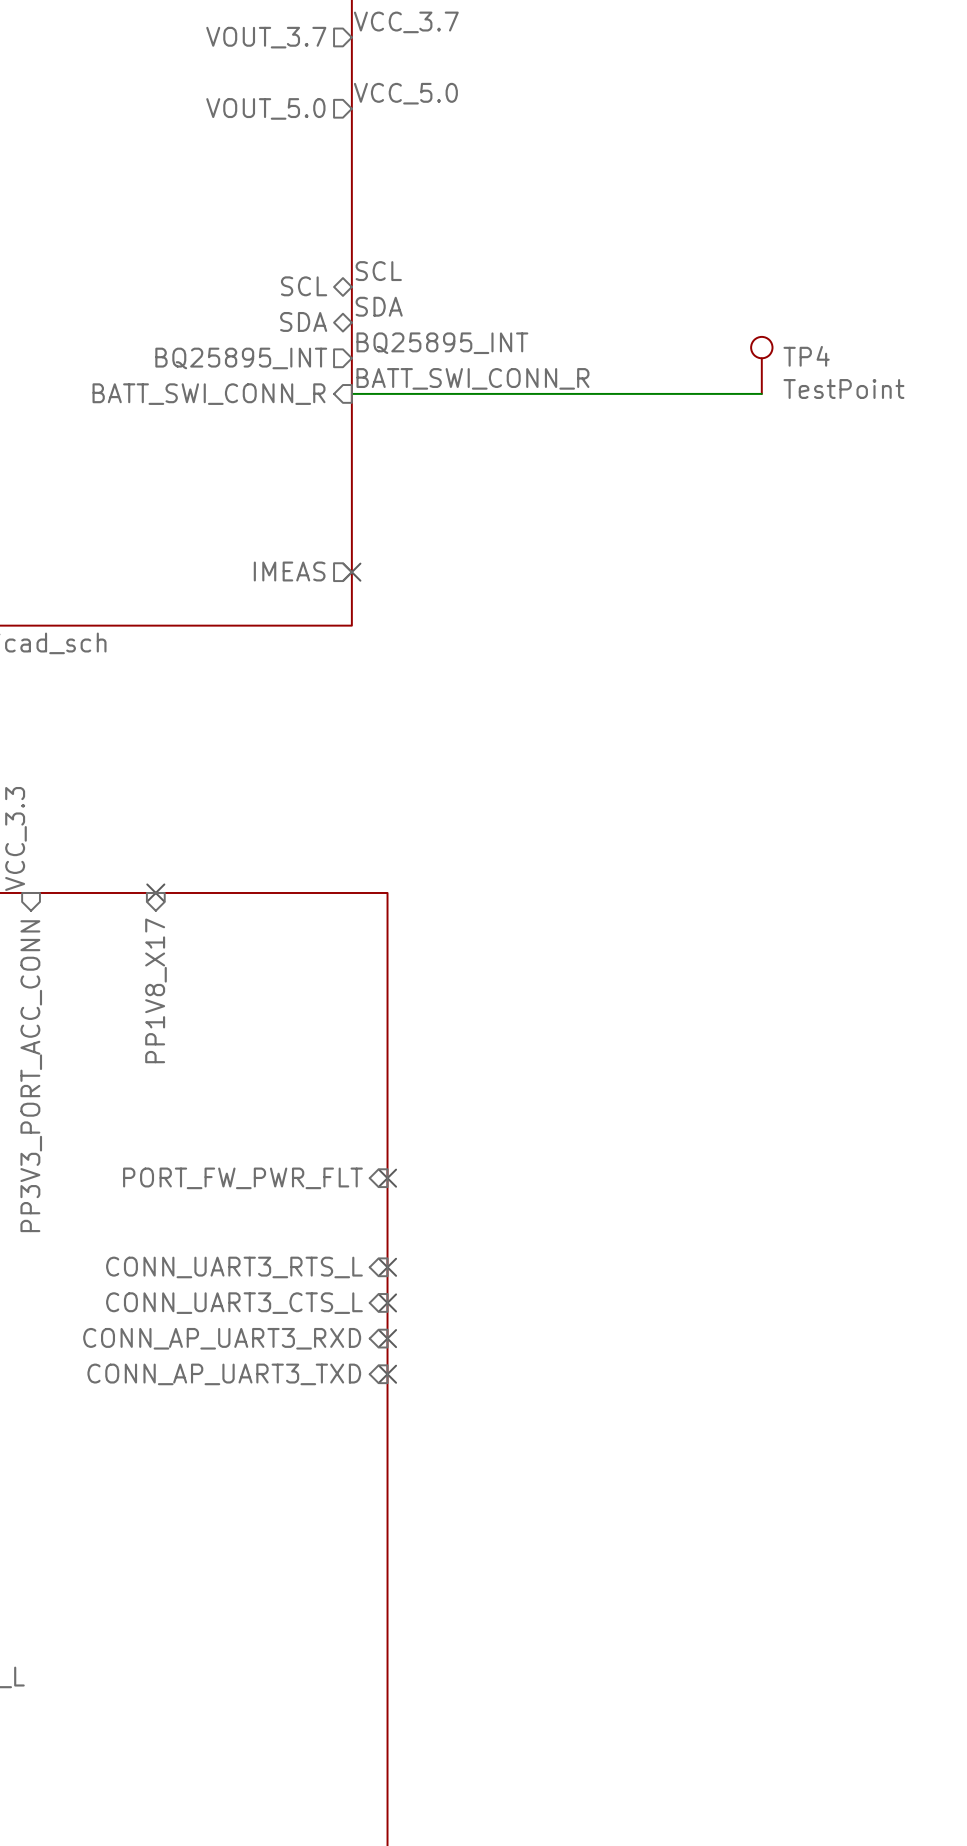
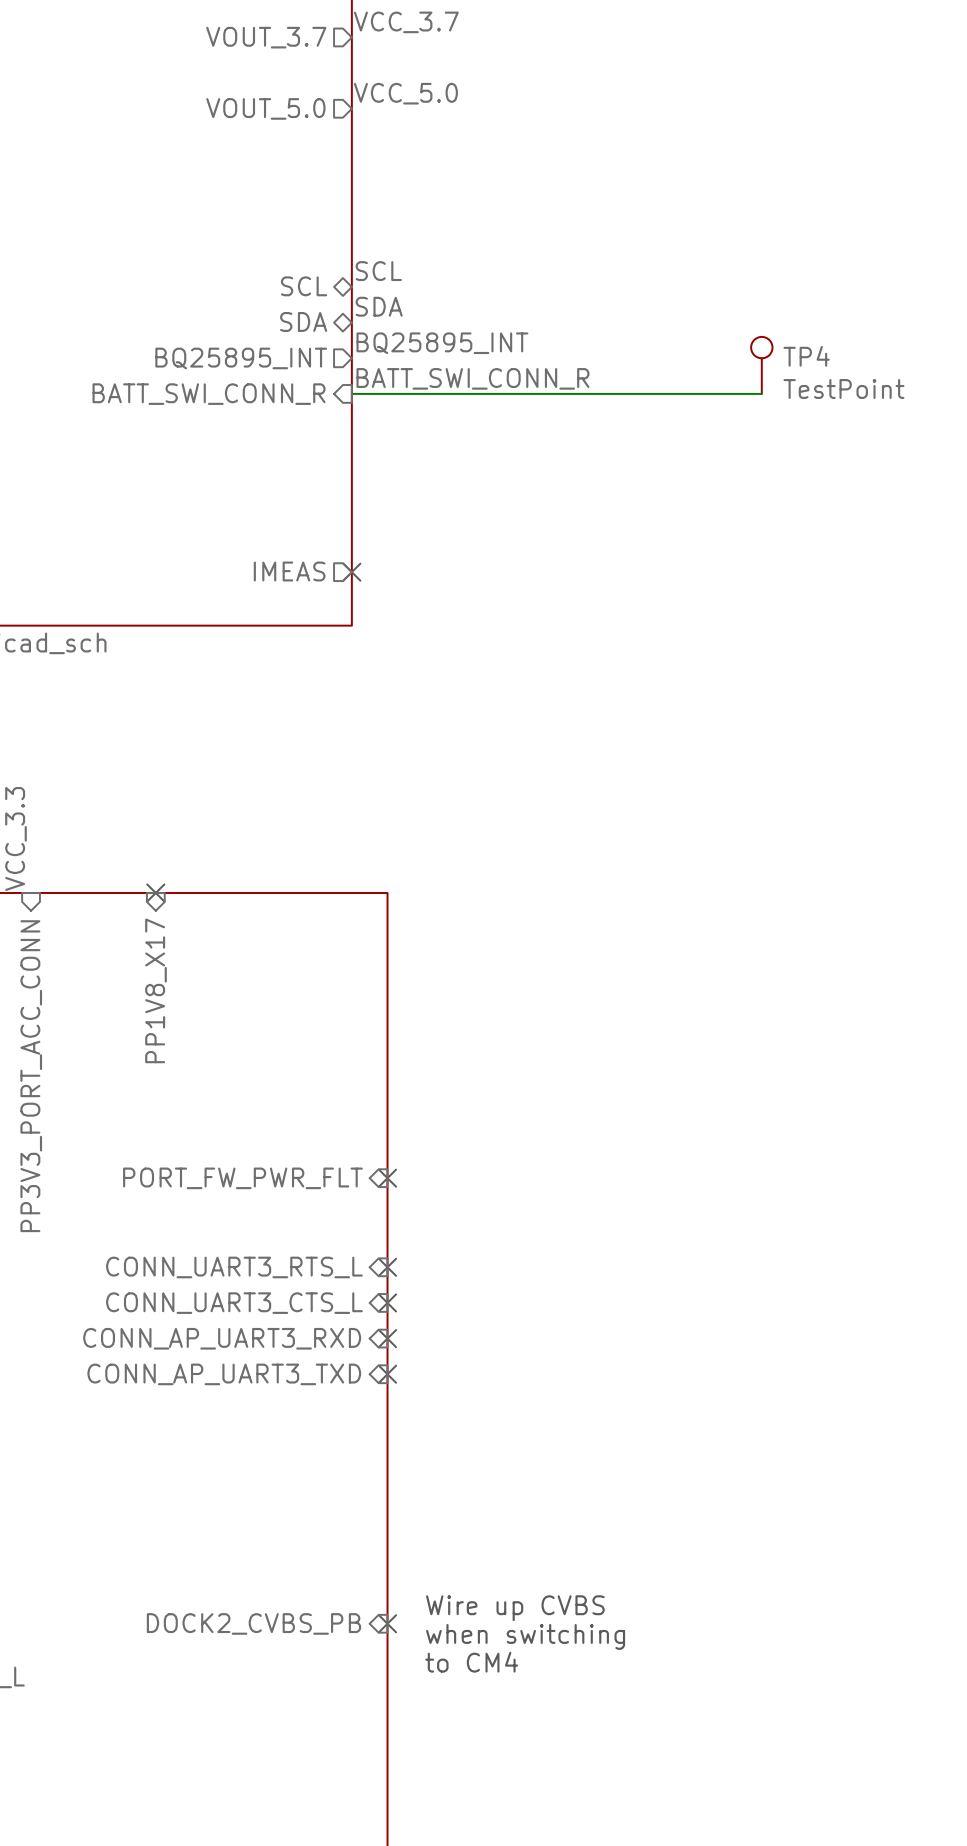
text: none -> Wire up CVBS (515, 1608)
sheet pin: none -> DOCK2_CVBS_PB (253, 1623)
no-connect mark: none -> (387, 1623)
text: none -> when switching (525, 1636)
text: none -> to CM4 (471, 1662)

